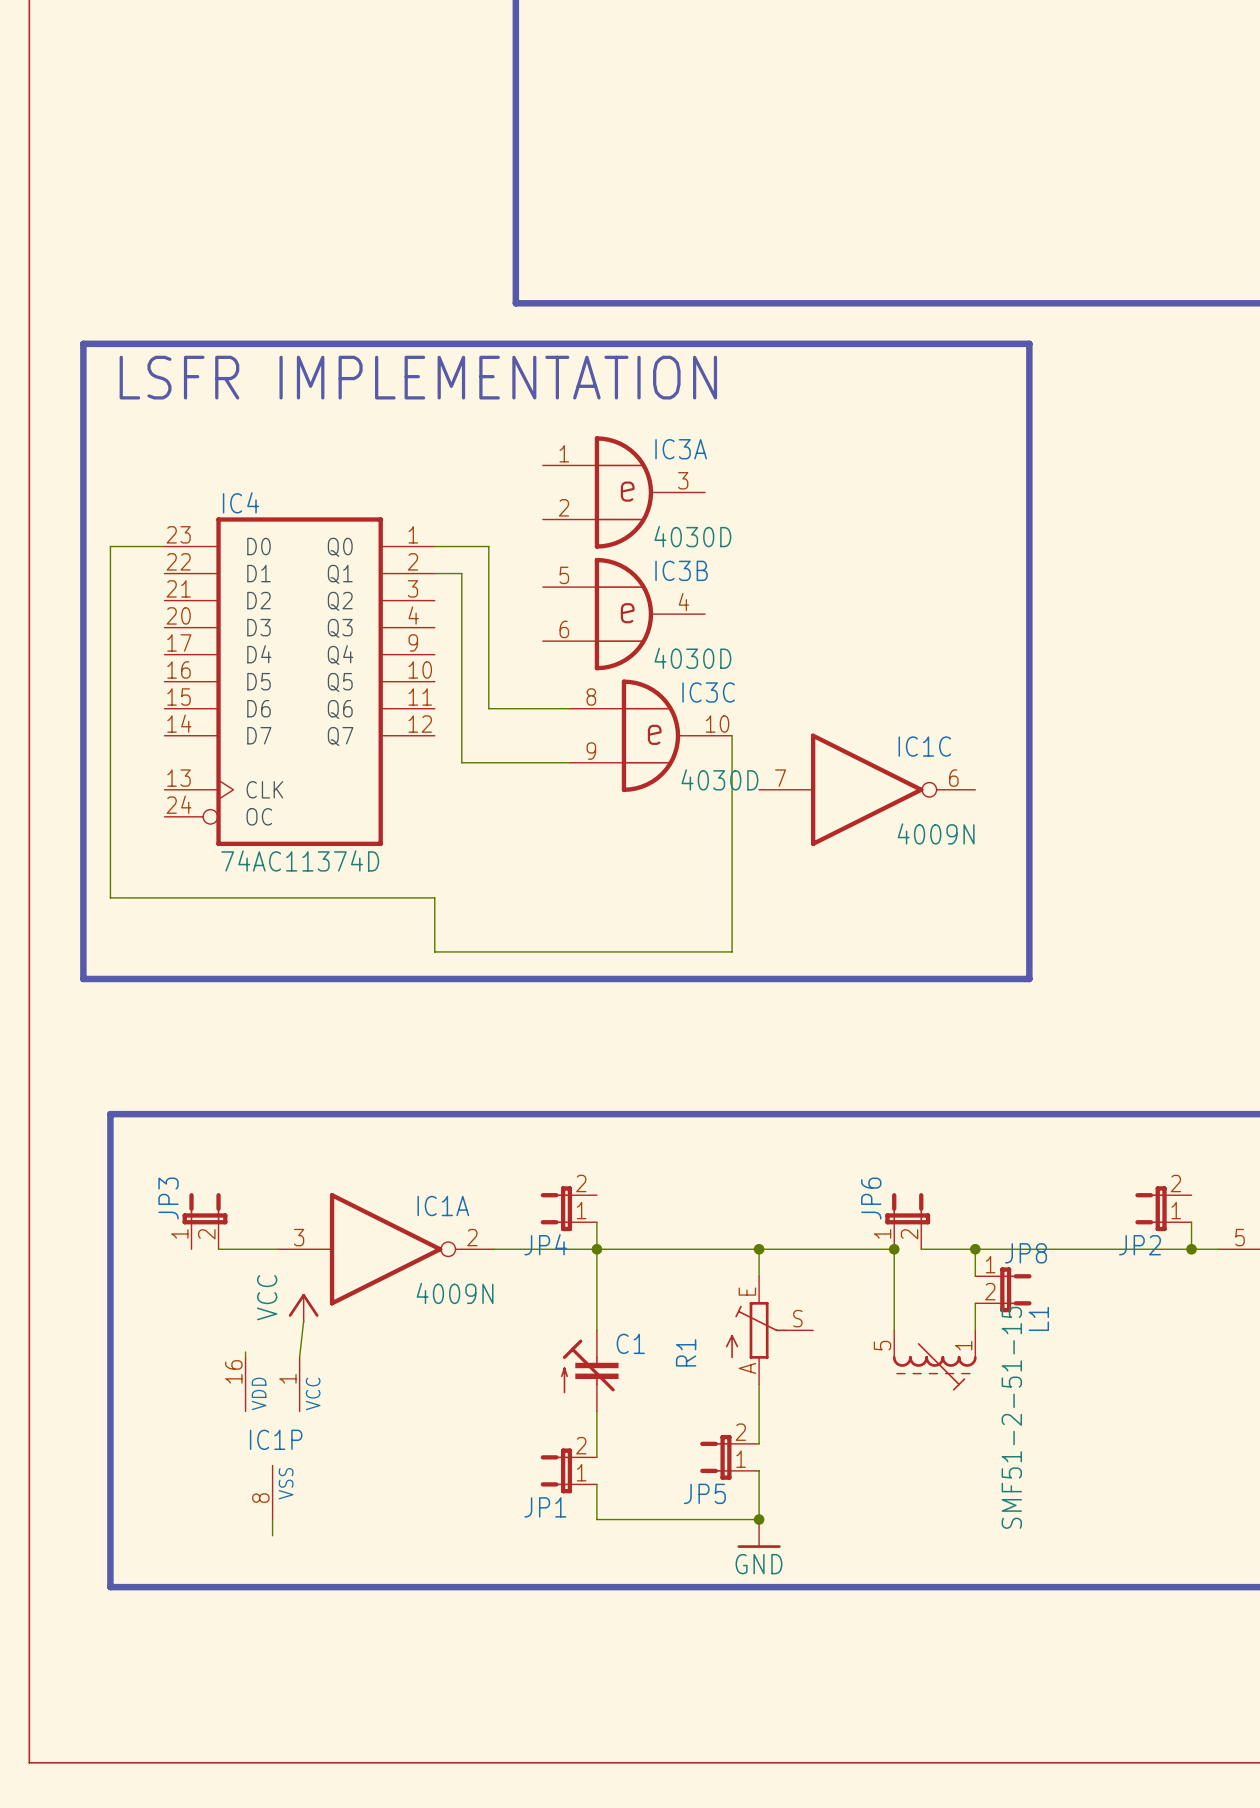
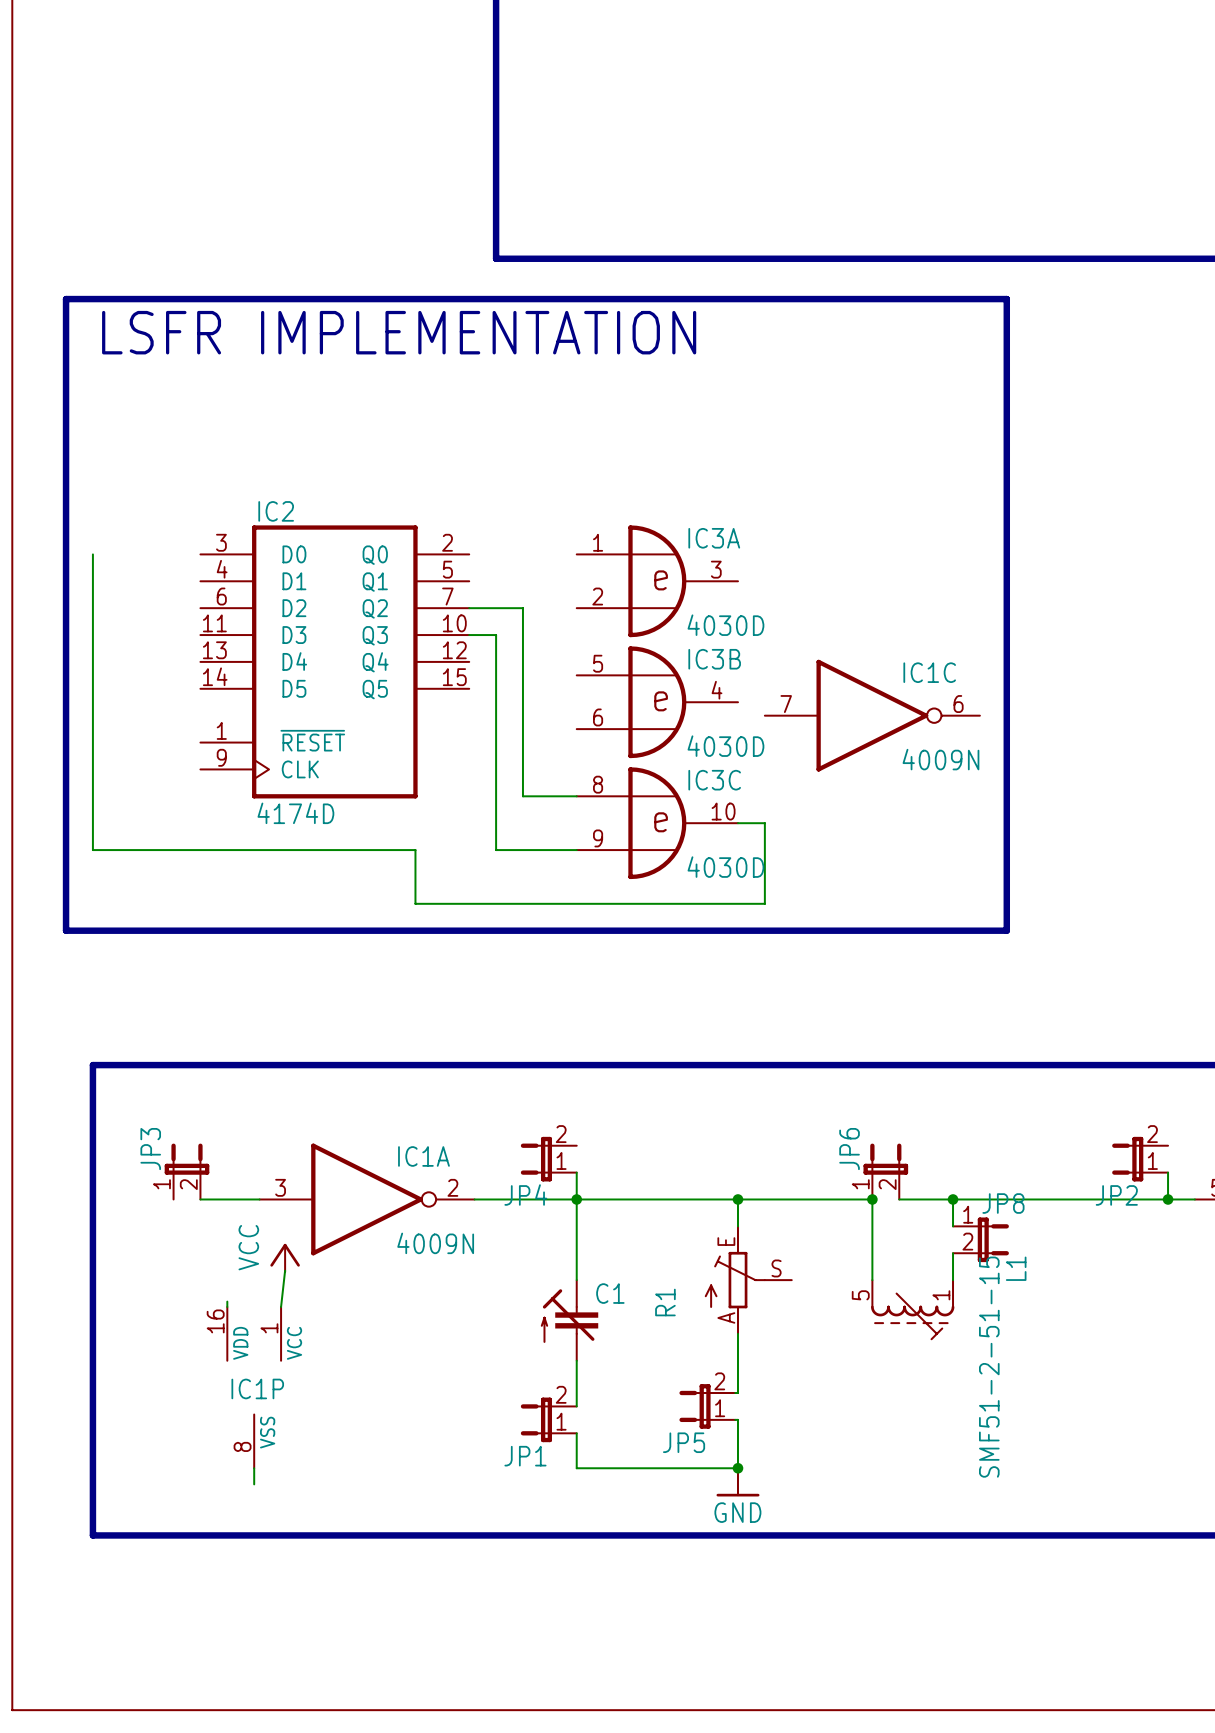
IC3A position: (623, 492) -> (657, 581)
wire: (164, 546) (110, 546) (110, 600) -> none
wire: (434, 546) (488, 546) (488, 708) (569, 708) -> none
wire: (434, 573) (461, 573) (461, 762) (569, 762) -> none
IC3B position: (623, 614) -> (657, 702)
wire: none -> (469, 608) (522, 608) (522, 796) (576, 796)
IC4: 74AC11374D (299, 681) -> none
wire: none -> (469, 635) (496, 635) (496, 850) (576, 850)
IC2: none -> 4174D (334, 661)
IC3C position: (650, 735) -> (657, 823)
wire: (732, 735) (732, 951) -> (737, 823) (764, 823) (764, 903) (711, 903)
IC1C position: (867, 789) -> (872, 715)

